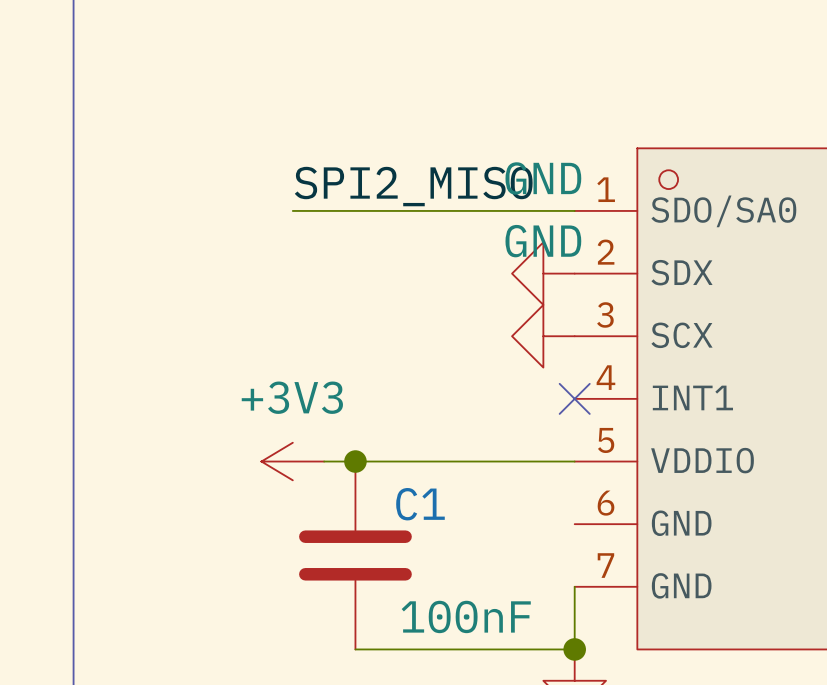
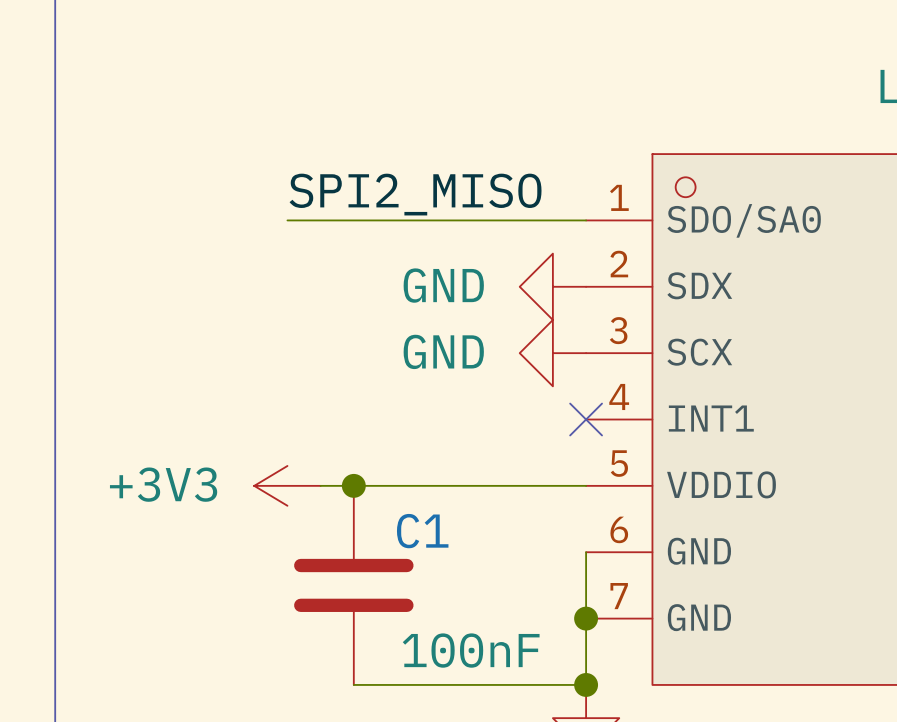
power symbol text position: GND (543, 178) -> GND (443, 285)
power symbol text position: GND (543, 241) -> GND (443, 351)
power symbol text position: +3V3 (292, 397) -> +3V3 (163, 484)
wire: none -> (586, 552) (586, 618)
junction: none -> (586, 618)

